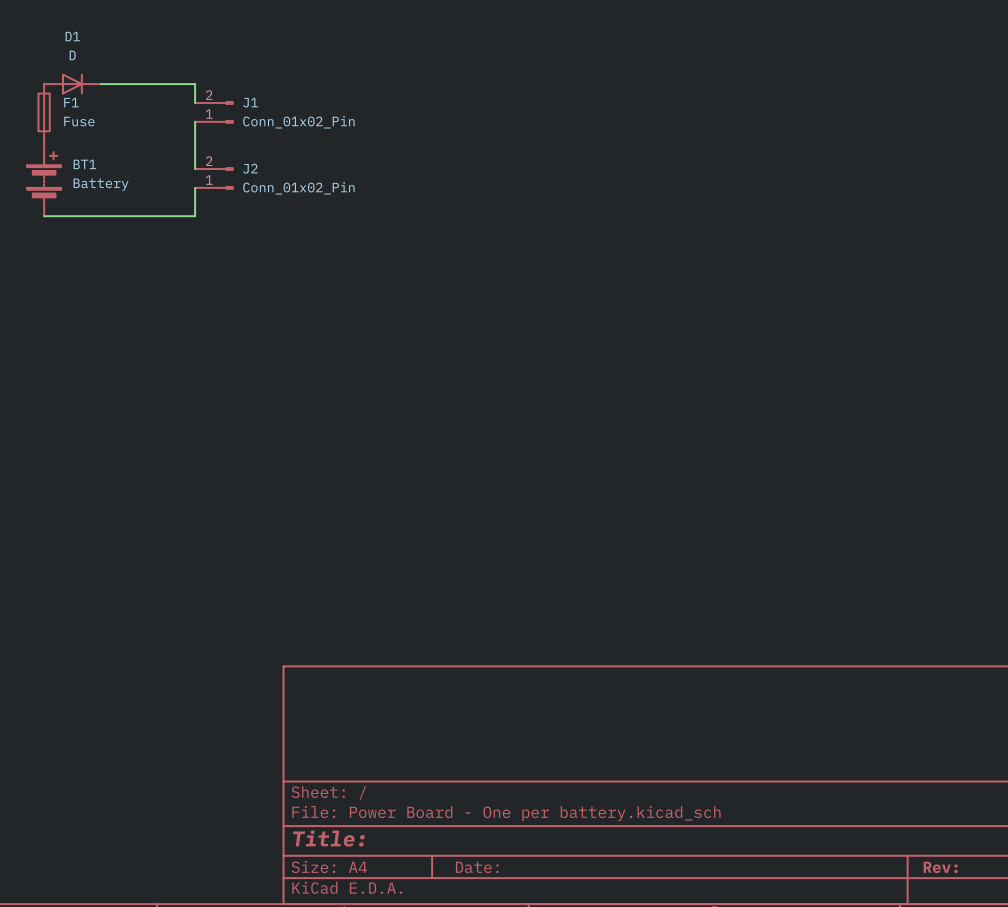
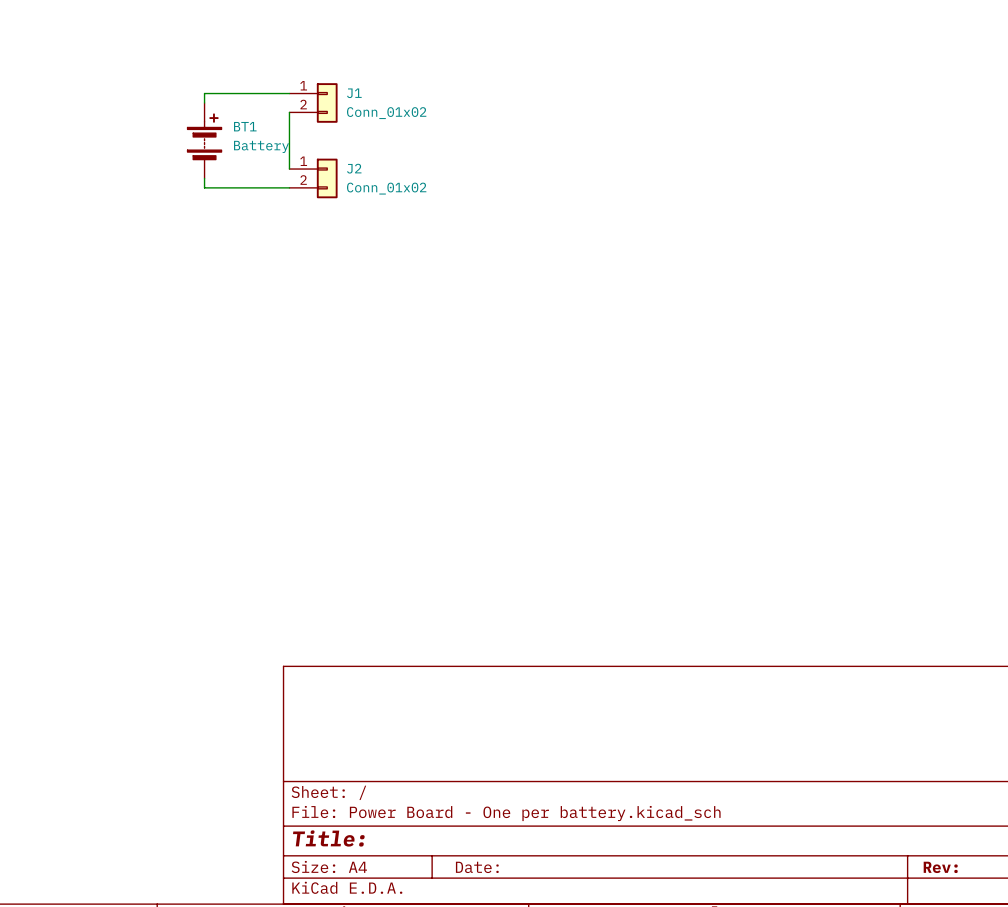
D1: D (72, 84) -> none
wire: (100, 84) (195, 84) (195, 102) -> none
wire: none -> (289, 93) (204, 93) (204, 102)
J1 symbol: [195, 101, 234, 124] -> [289, 83, 338, 123]
F1: Fuse (44, 112) -> none
wire: none -> (289, 112) (289, 169)
wire: (195, 121) (195, 169) -> none
J1 value: Conn_01x02_Pin (298, 122) -> Conn_01x02 (386, 113)
J2 symbol: [195, 167, 234, 190] -> [289, 158, 338, 199]
BT1 position: (44, 178) -> (204, 140)
wire: none -> (204, 178) (204, 187) (289, 187)
wire: (195, 187) (195, 216) (44, 216) -> none
J2 value: Conn_01x02_Pin (298, 188) -> Conn_01x02 (386, 188)

